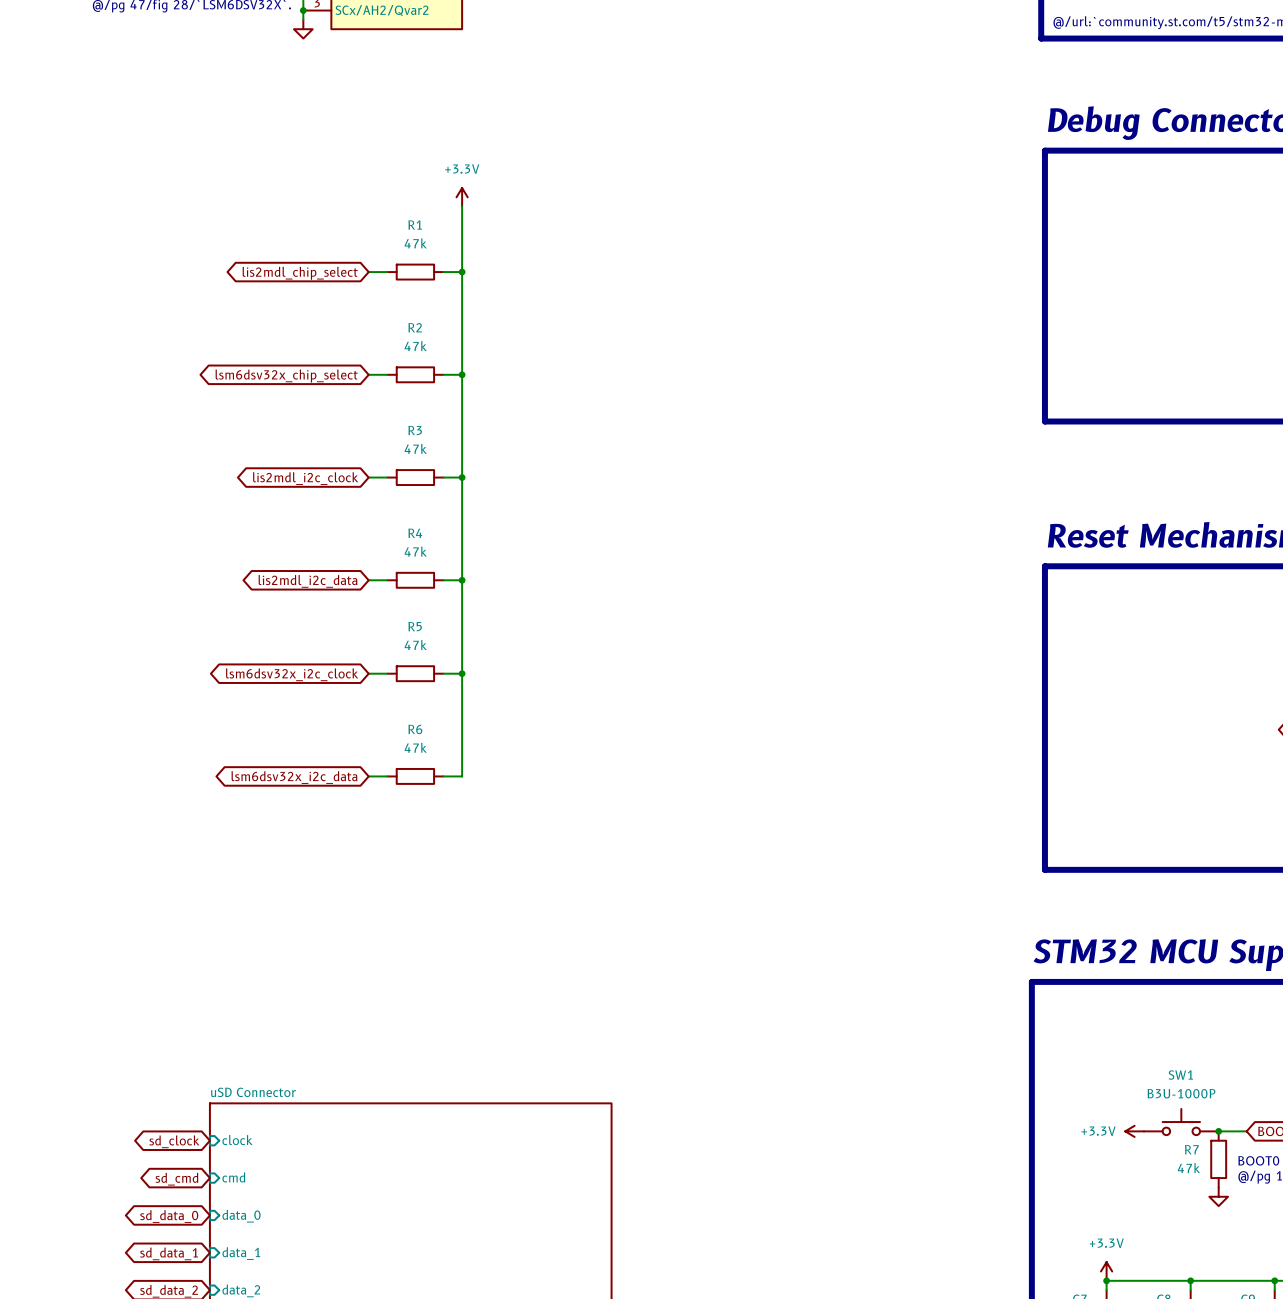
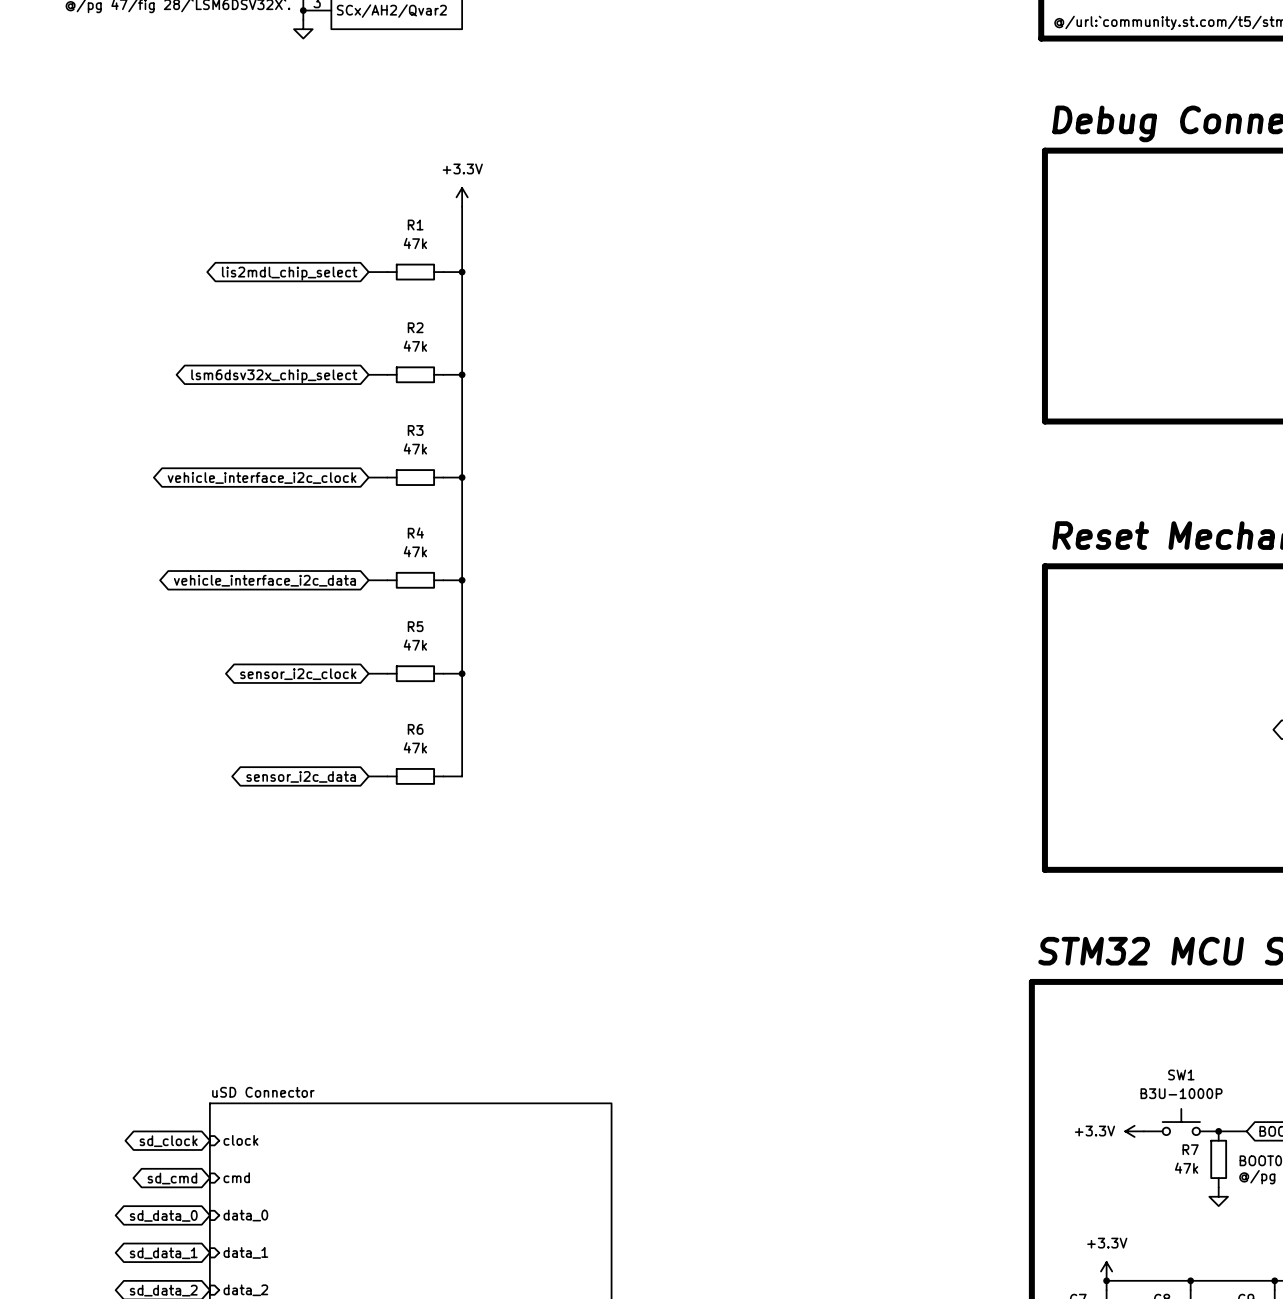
global label: lis2mdl_i2c_clock (305, 478) -> vehicle_interface_i2c_clock (262, 477)
global label: lis2mdl_i2c_data (307, 581) -> vehicle_interface_i2c_data (264, 580)
global label: lsm6dsv32x_i2c_clock (292, 674) -> sensor_i2c_clock (298, 674)
global label: lsm6dsv32x_i2c_data (294, 777) -> sensor_i2c_data (301, 776)

